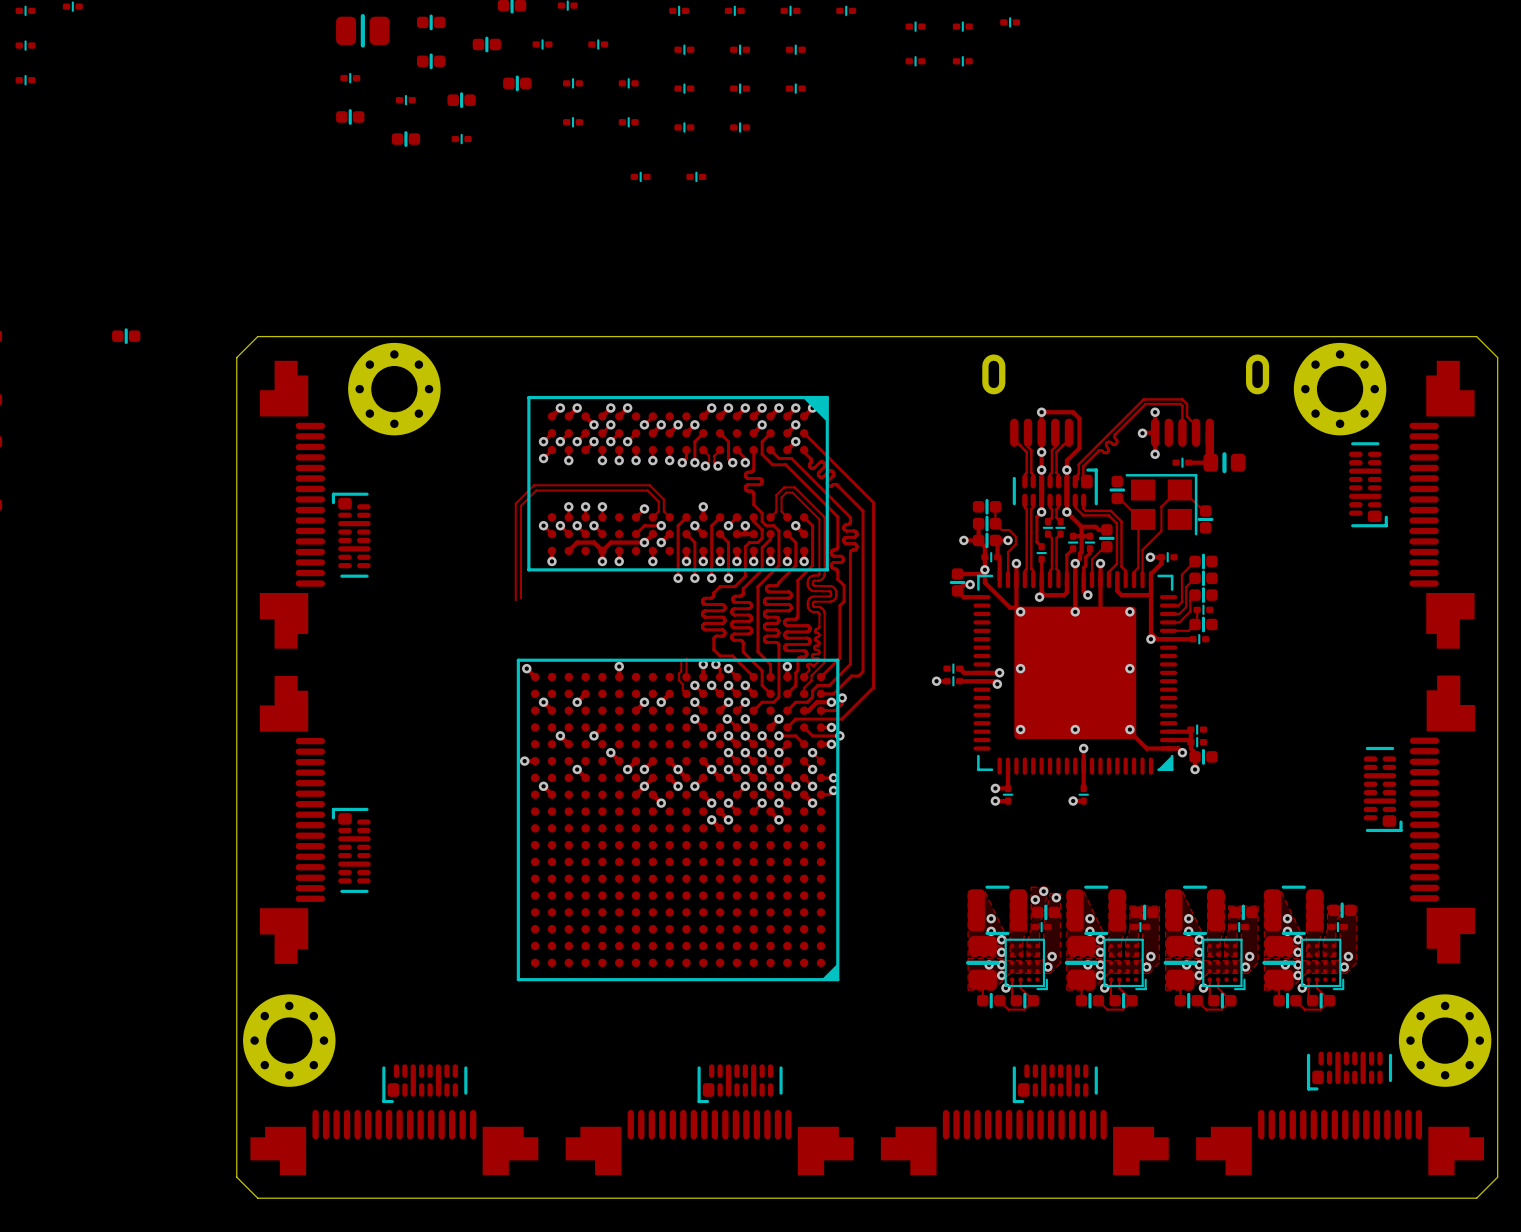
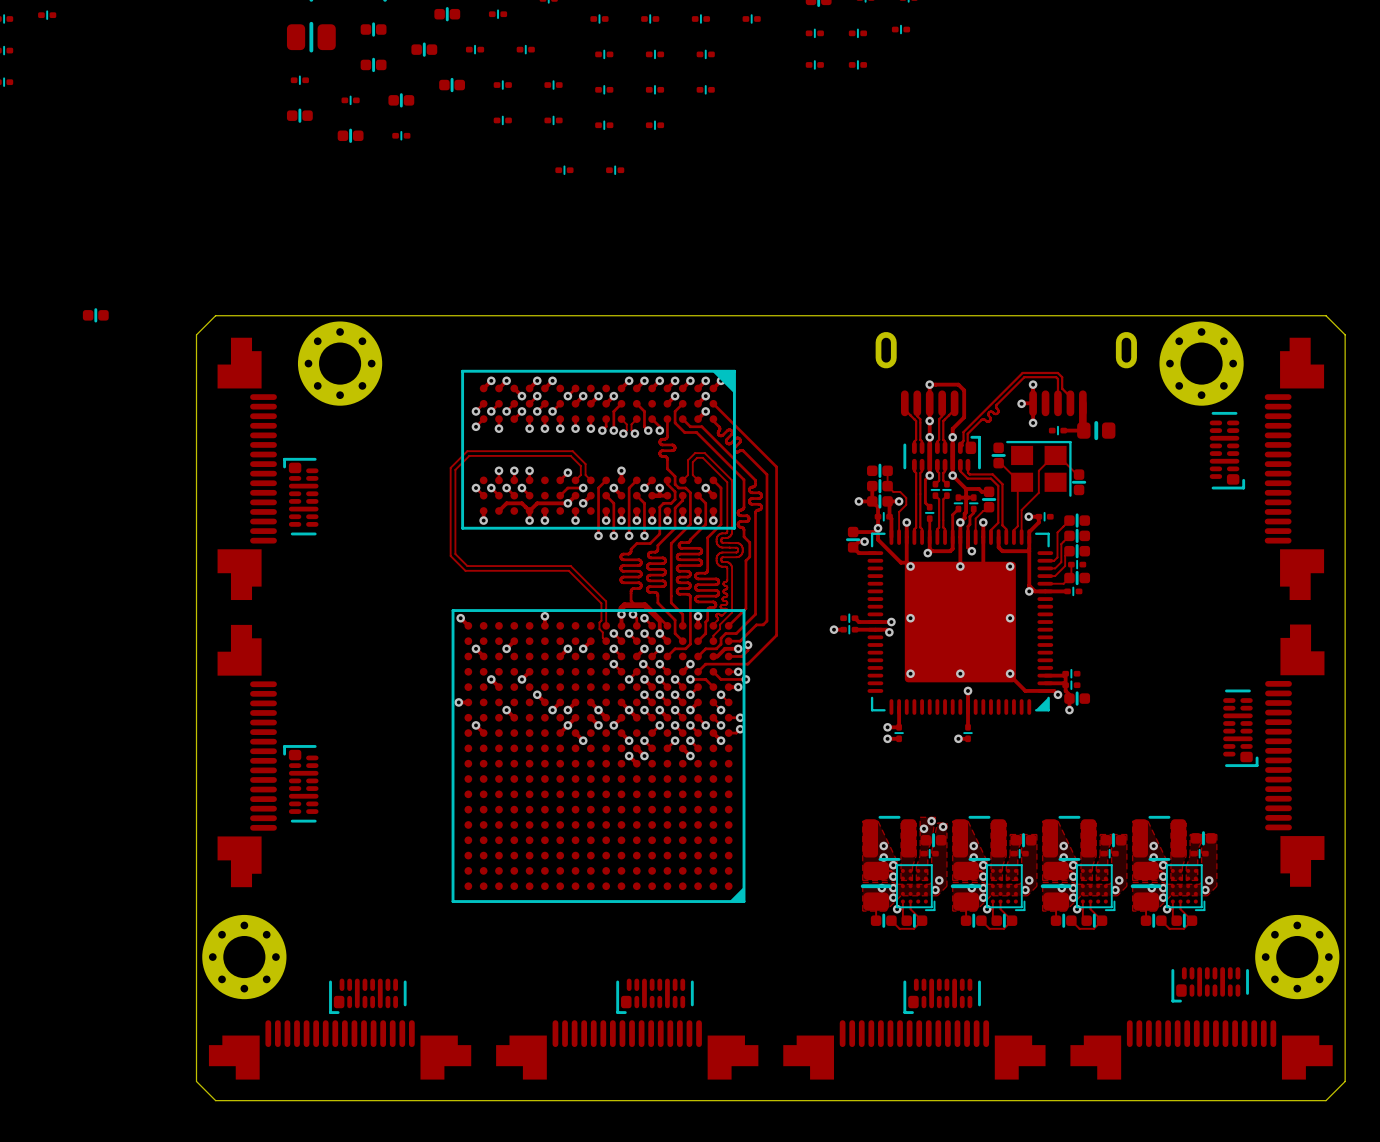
track: none -> (455, 554) (467, 566) (570, 566) (606, 601) (606, 609)
track: none -> (450, 556) (465, 570) (568, 570) (601, 603) (601, 610)
track: none -> (621, 614) (621, 608) (624, 605) (644, 605) (659, 620) (659, 633)

